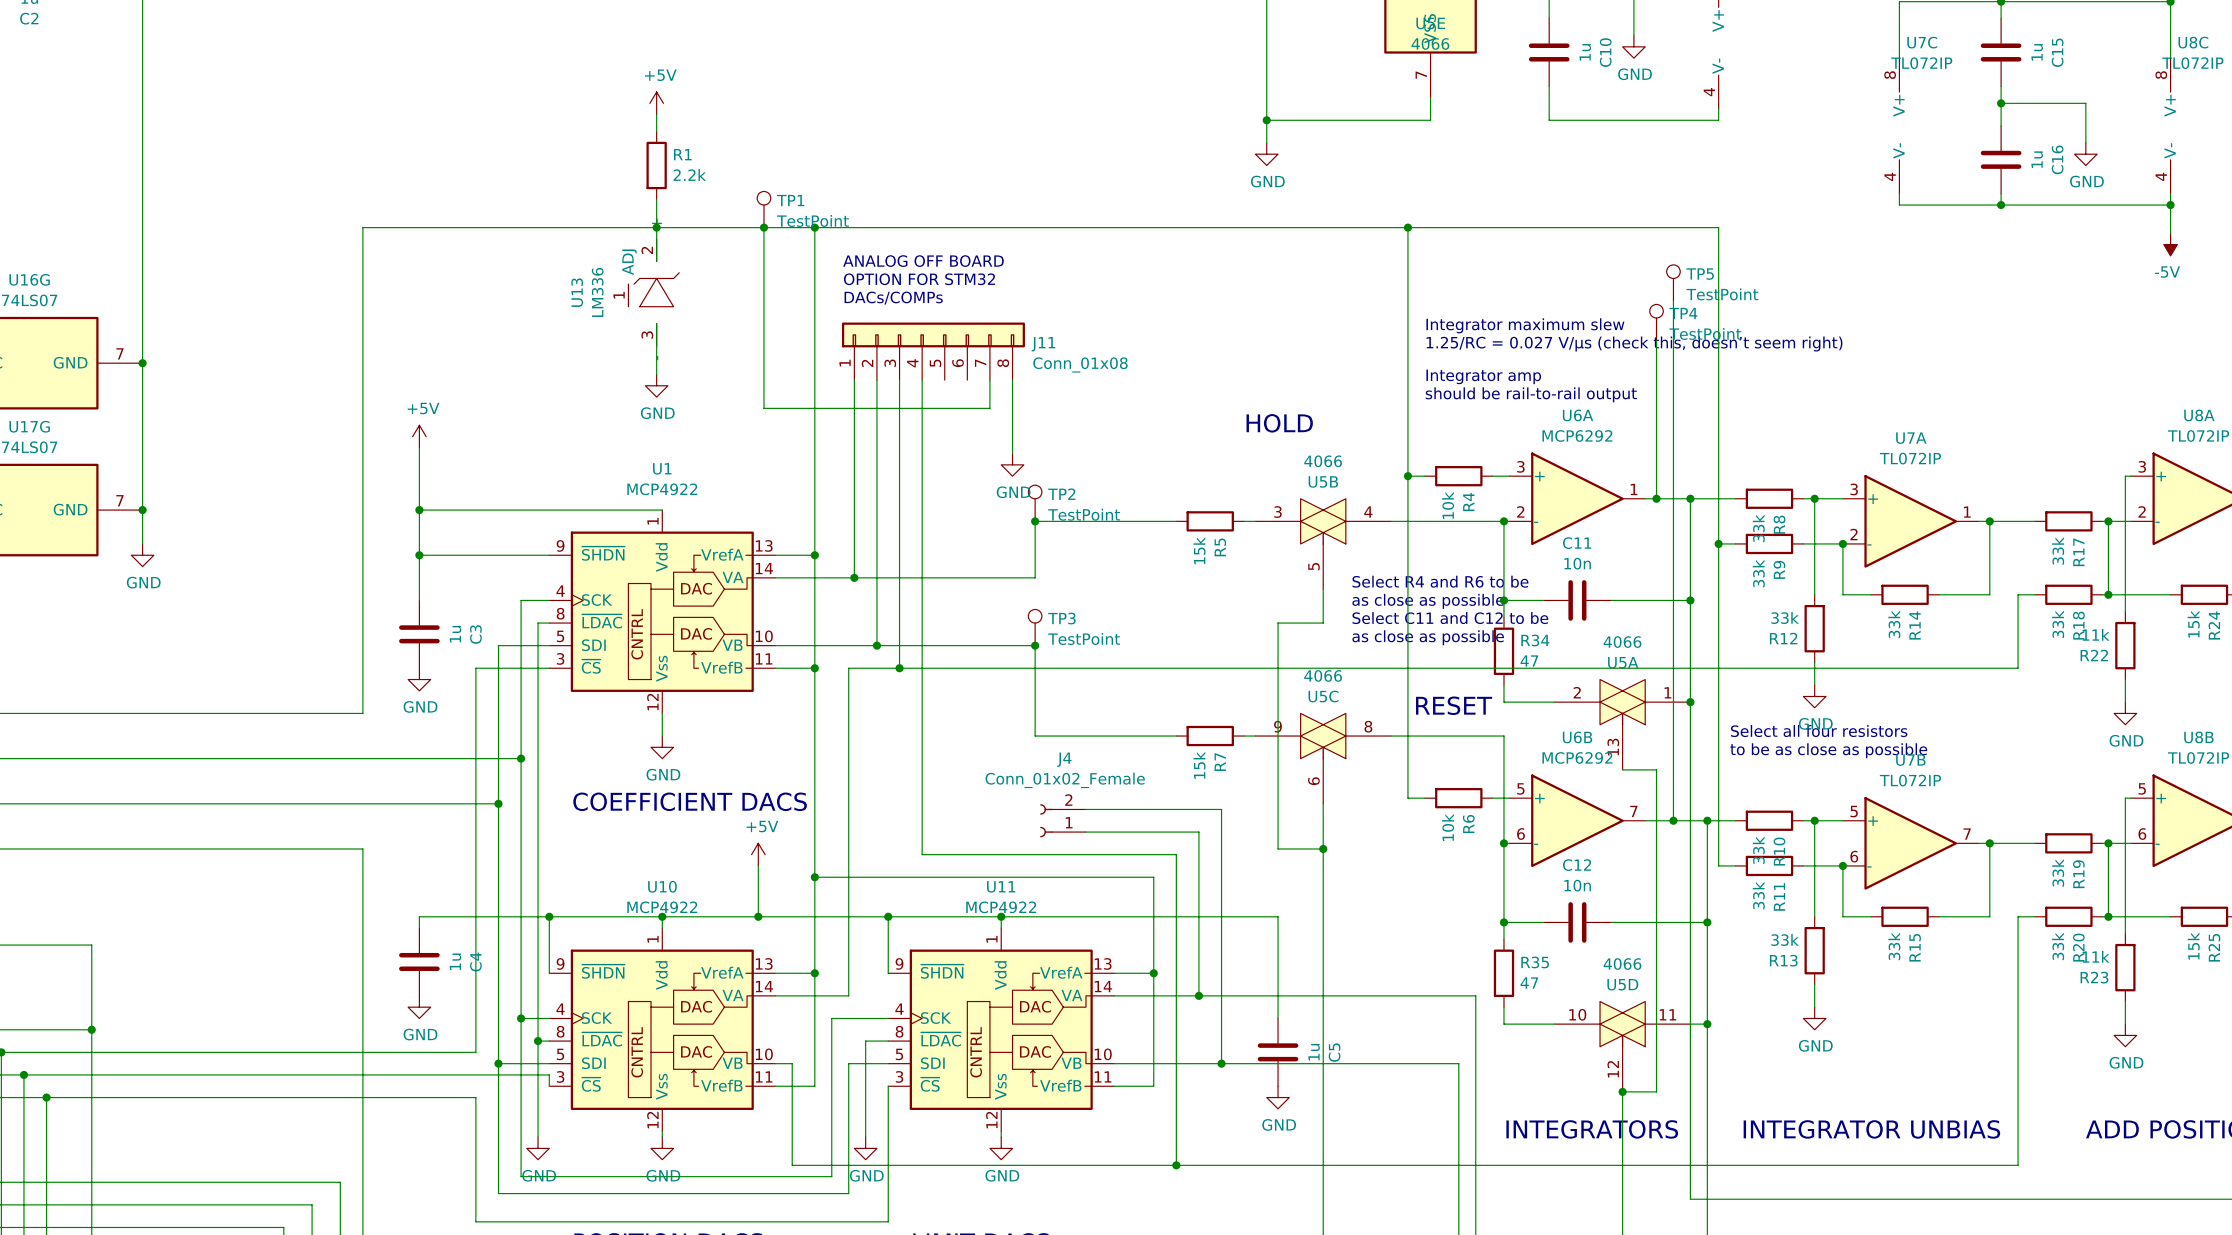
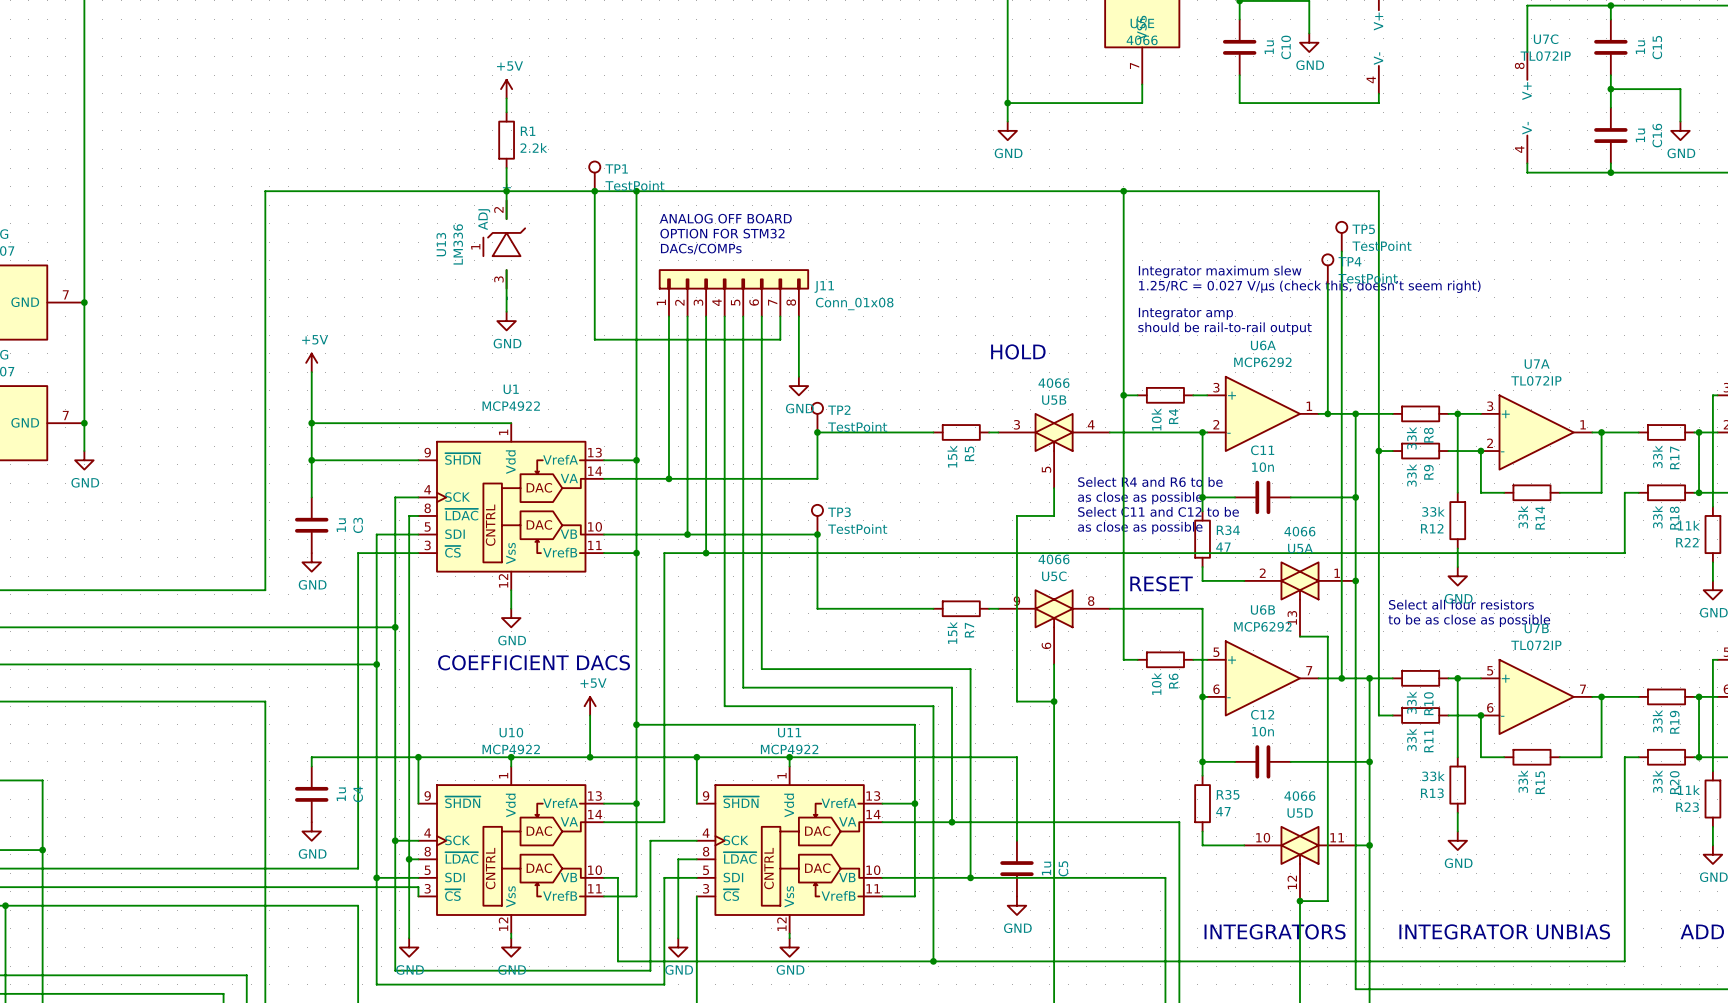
wire: none -> (743, 316) (743, 687) (859, 687)
wire: none -> (761, 316) (761, 669) (859, 669)
J4: Conn_01x02_Female (1063, 820) -> none

